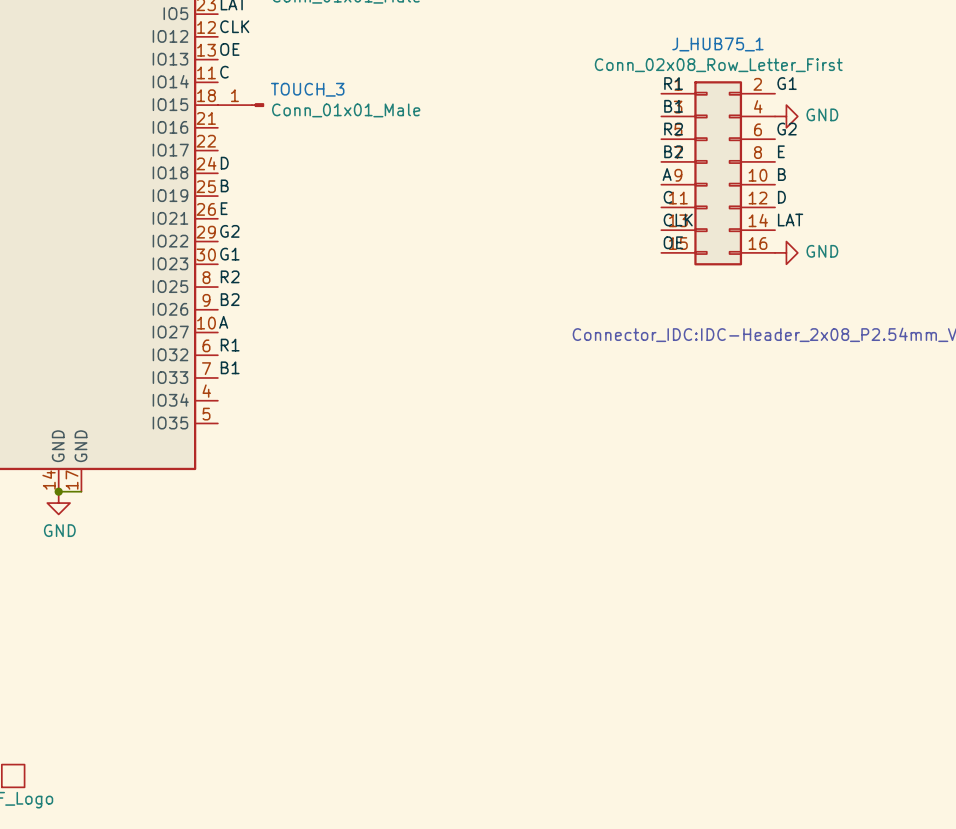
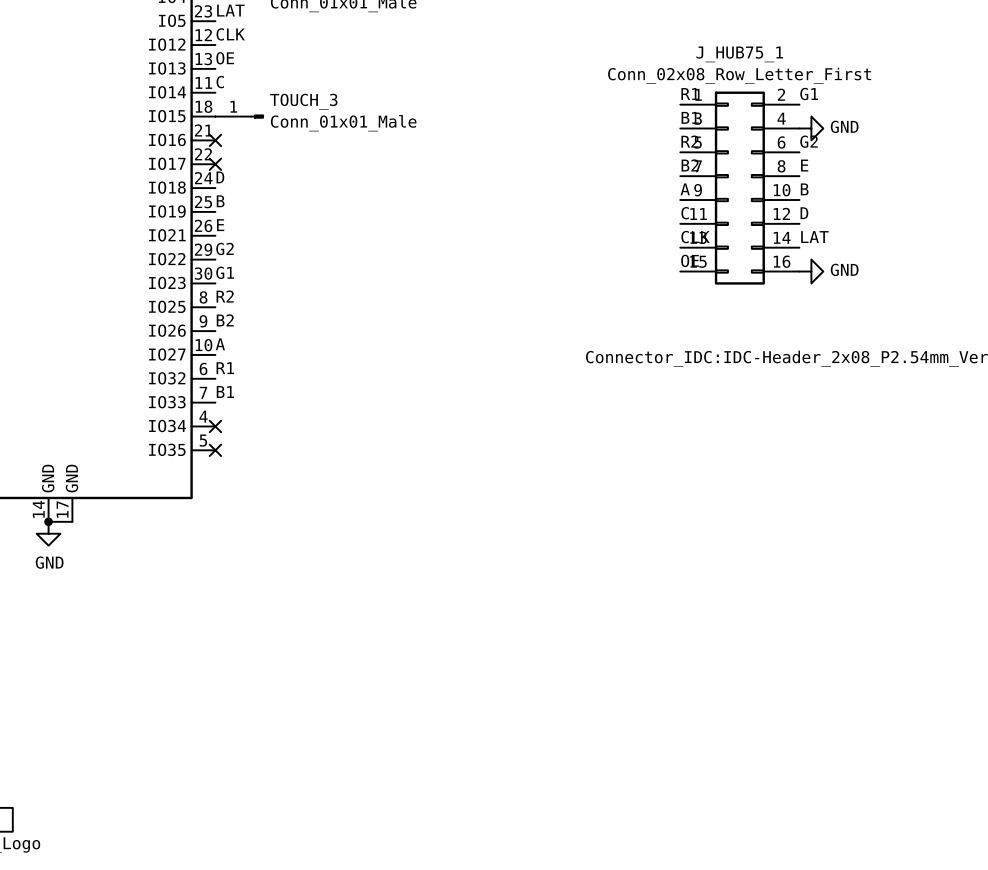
no-connect mark: none -> (215, 140)
no-connect mark: none -> (215, 164)
no-connect mark: none -> (215, 426)
no-connect mark: none -> (215, 450)

